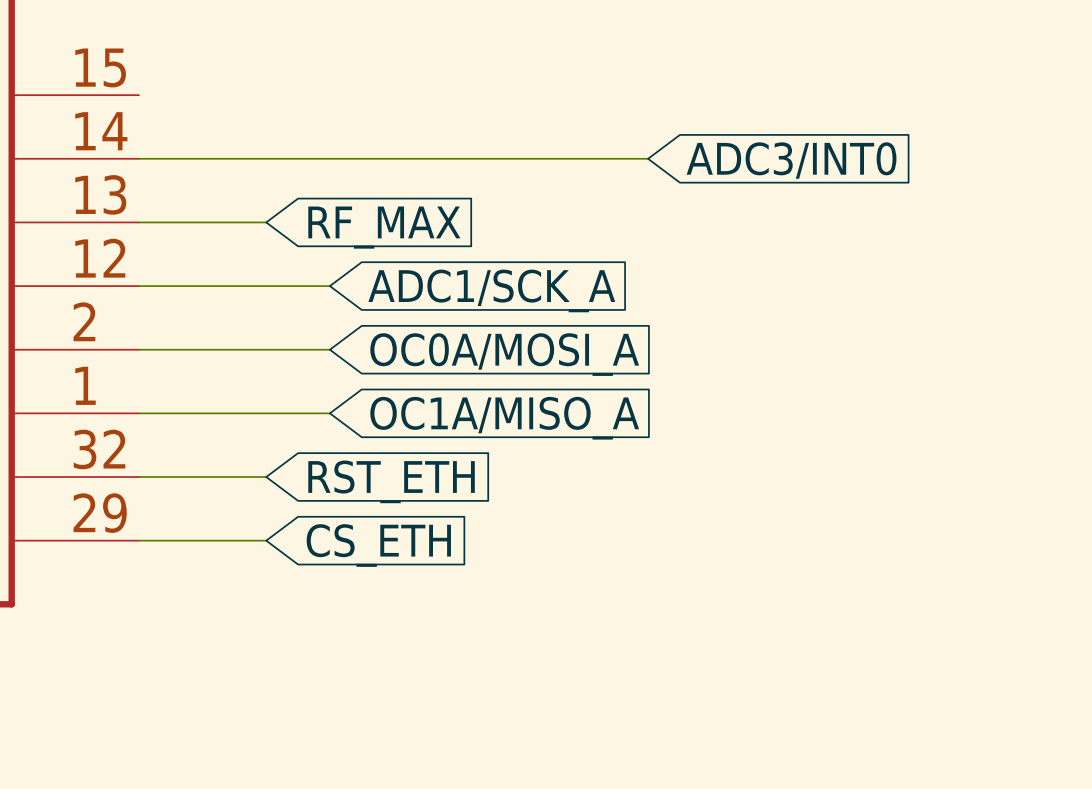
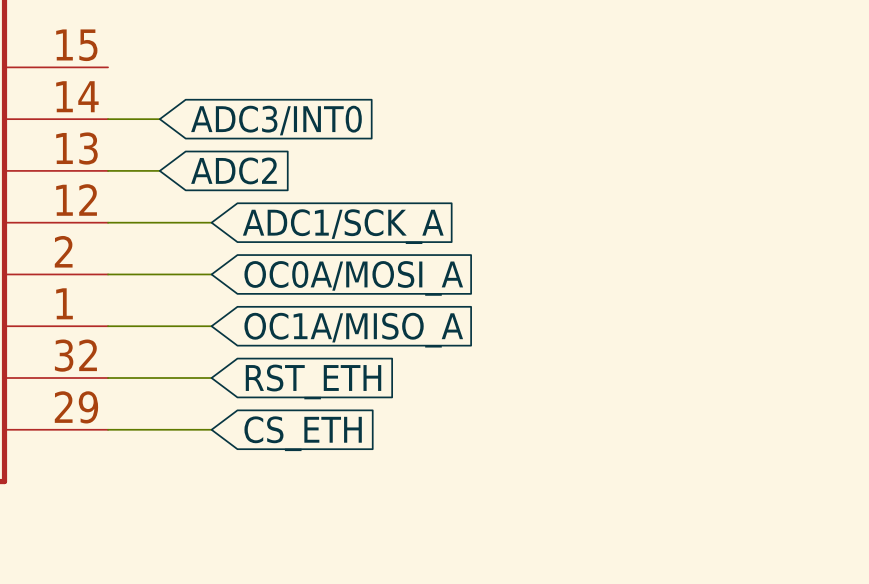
wire: (202, 158) (648, 158) -> none
global label position: ADC3/INT0 (791, 160) -> ADC3/INT0 (276, 120)
wire: (202, 222) (266, 222) -> none
global label: none -> ADC2 (233, 170)
global label: RF_MAX (384, 227) -> none
wire: (266, 286) (329, 286) -> none
global label position: ADC1/SCK_A (491, 290) -> ADC1/SCK_A (343, 226)
wire: (266, 349) (329, 349) -> none
global label position: OC0A/MOSI_A (504, 354) -> OC0A/MOSI_A (353, 278)
wire: (266, 413) (329, 413) -> none
global label position: OC1A/MISO_A (504, 418) -> OC1A/MISO_A (353, 330)

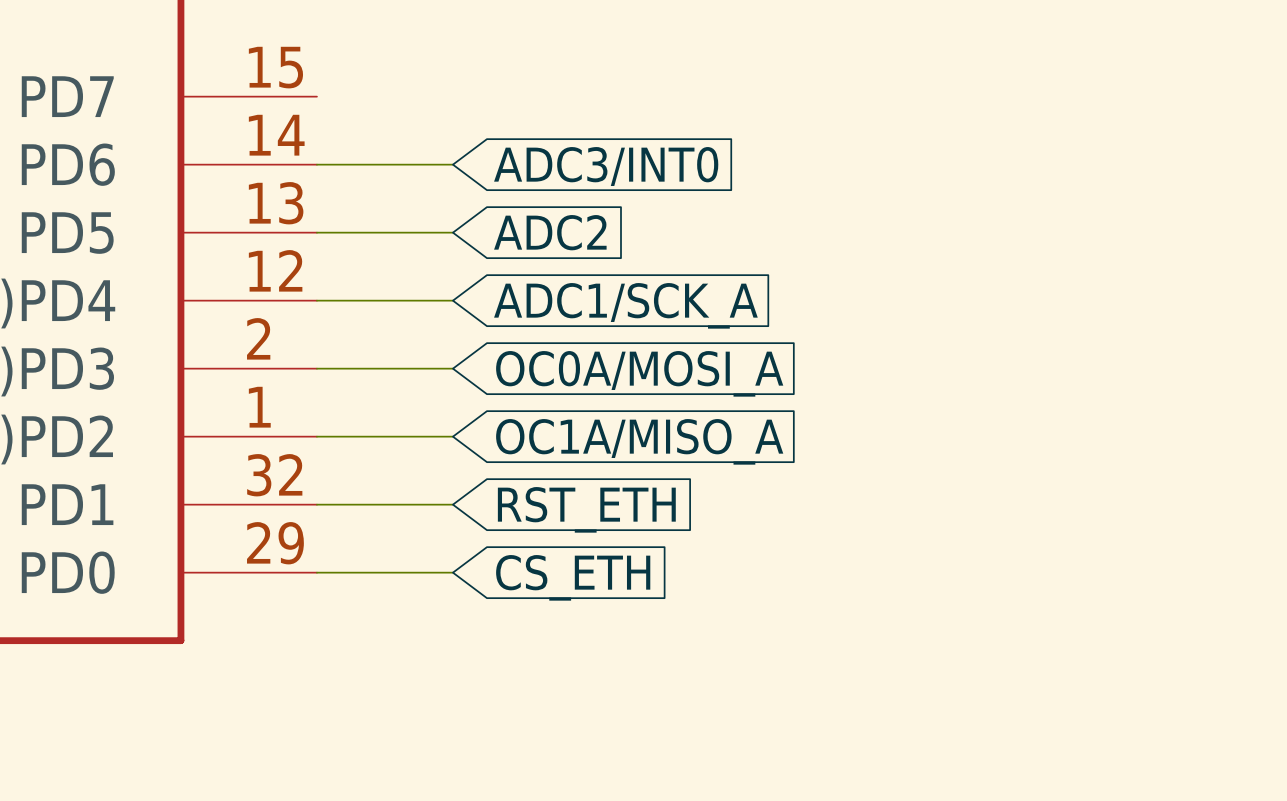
wire: none -> (384, 164) (452, 164)
global label position: ADC3/INT0 (276, 120) -> ADC3/INT0 (606, 166)
wire: none -> (384, 232) (452, 232)
global label position: ADC2 (233, 170) -> ADC2 (550, 232)

